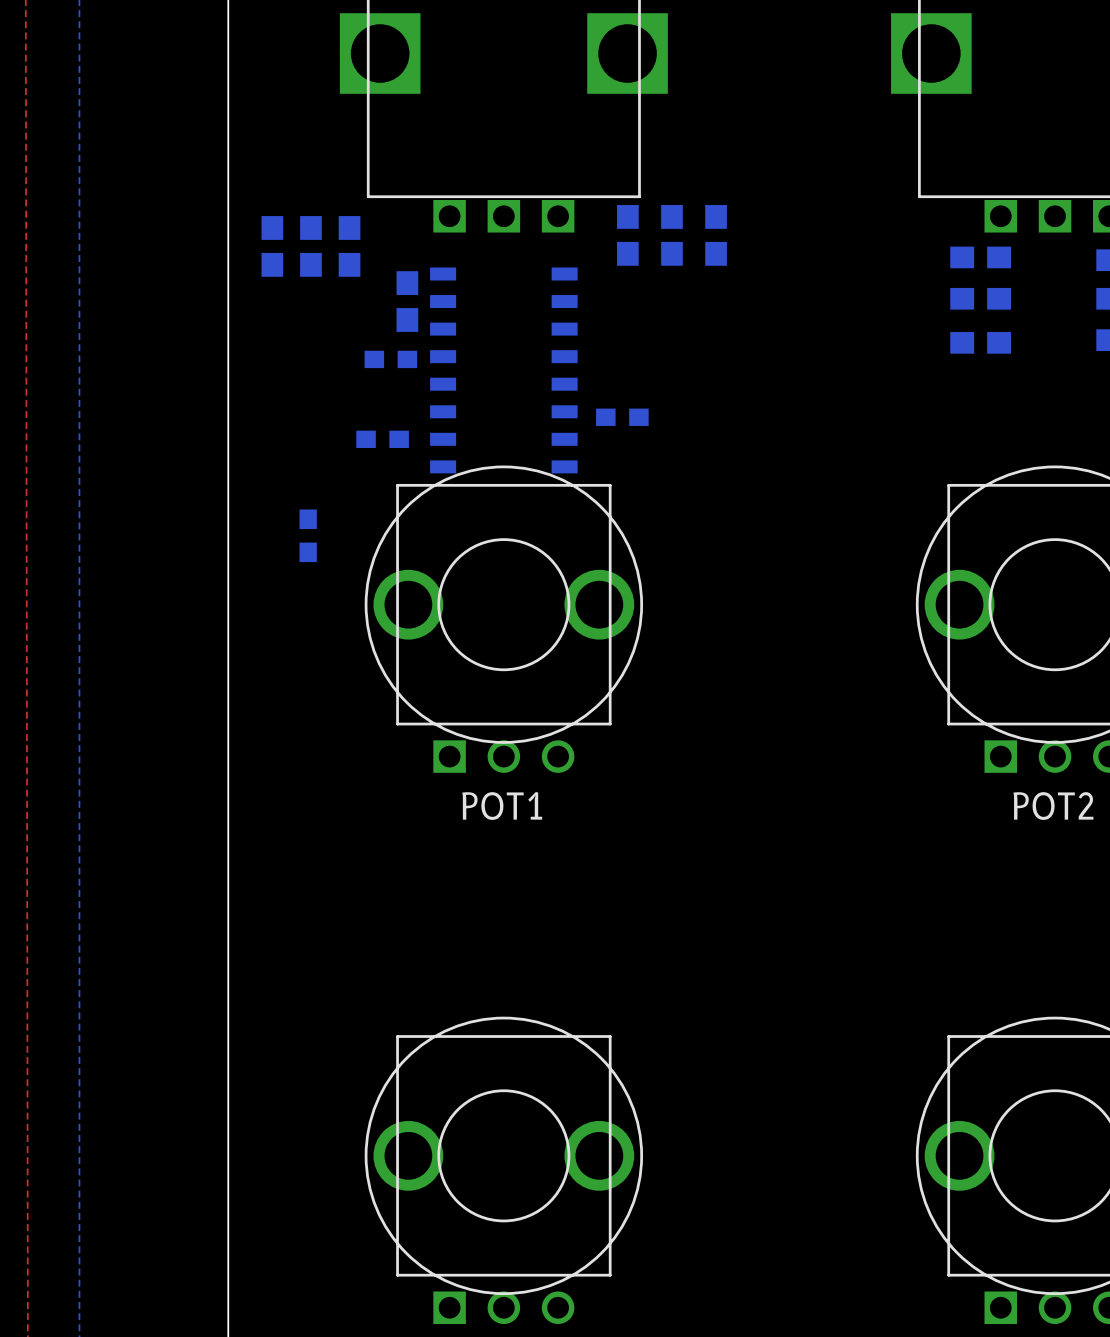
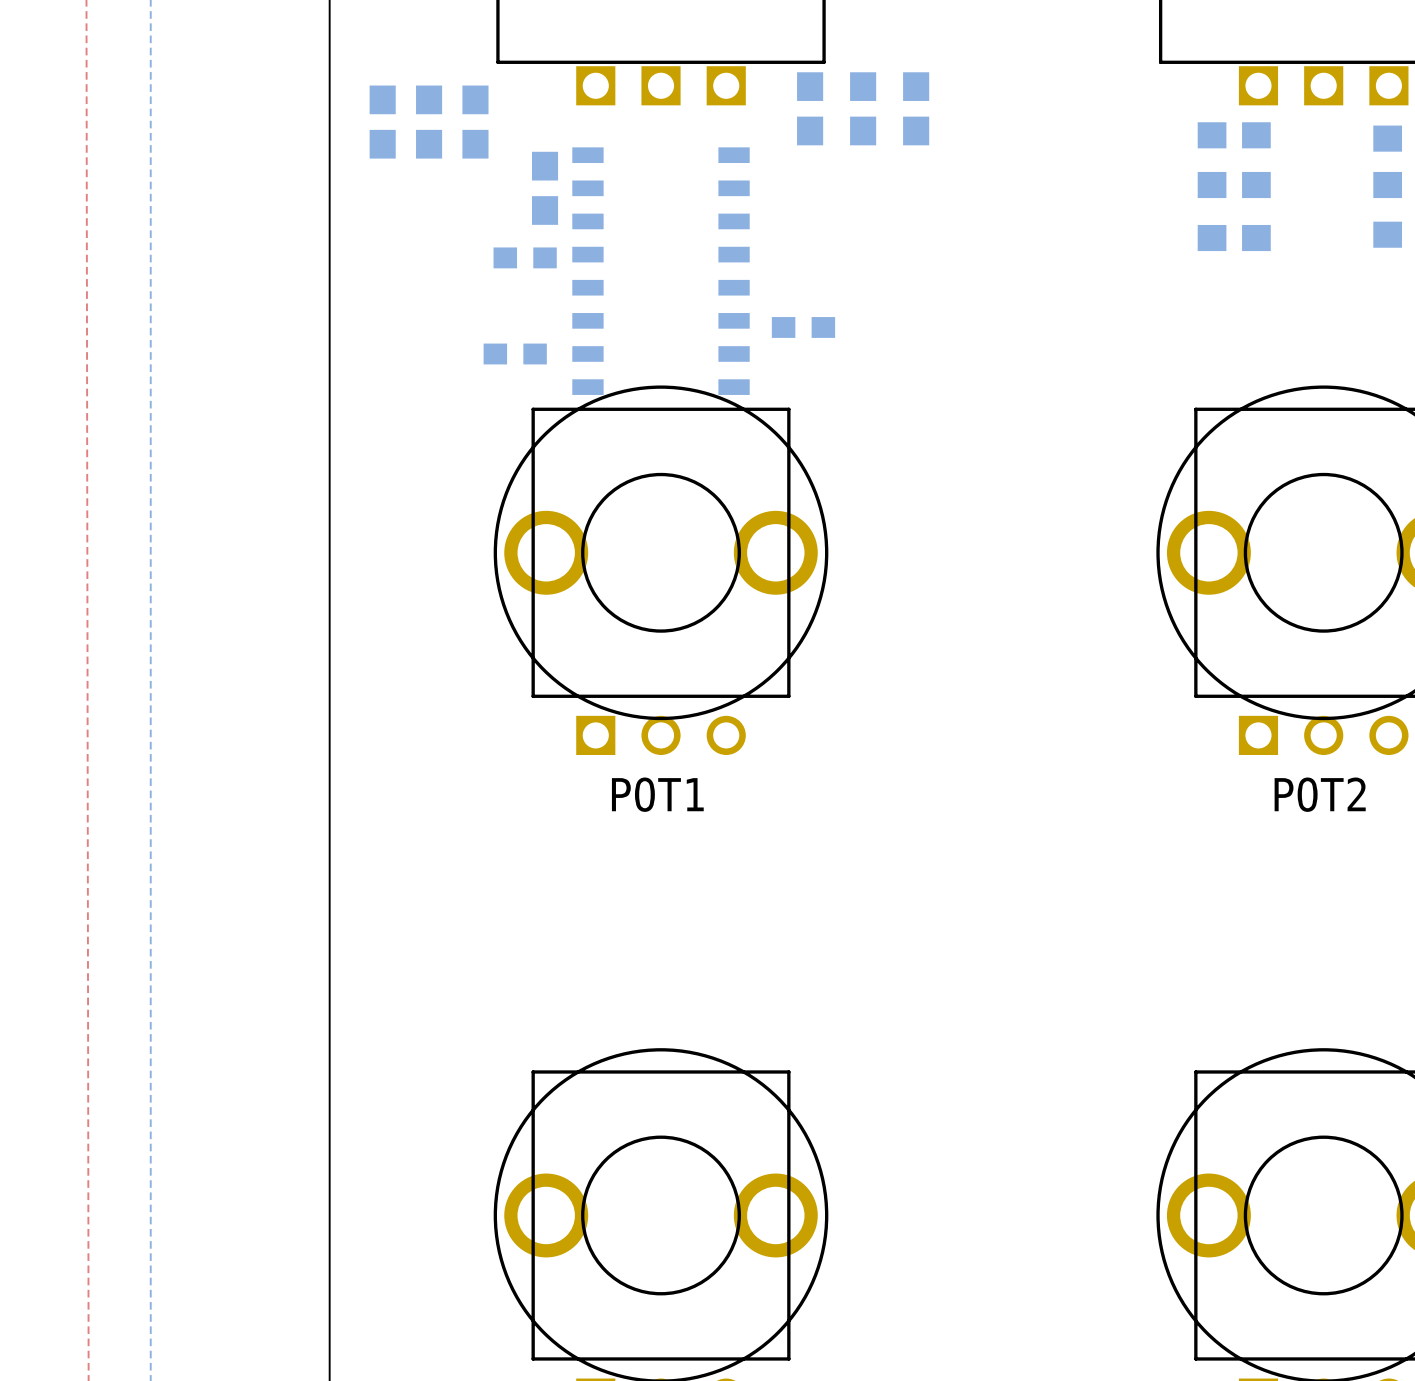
part: (308, 535) -> none

